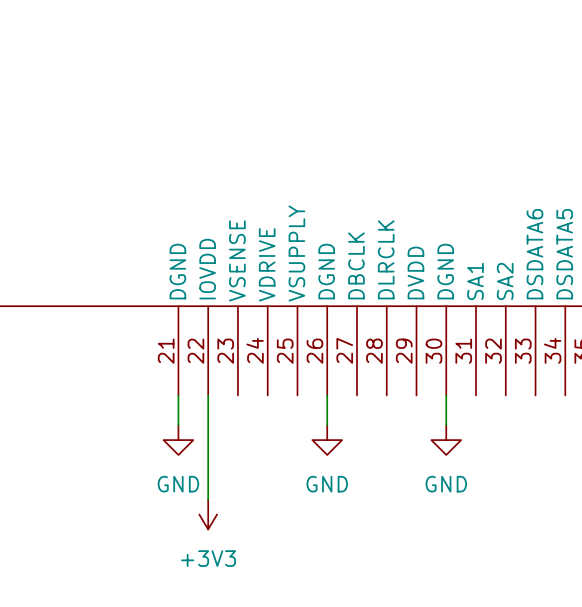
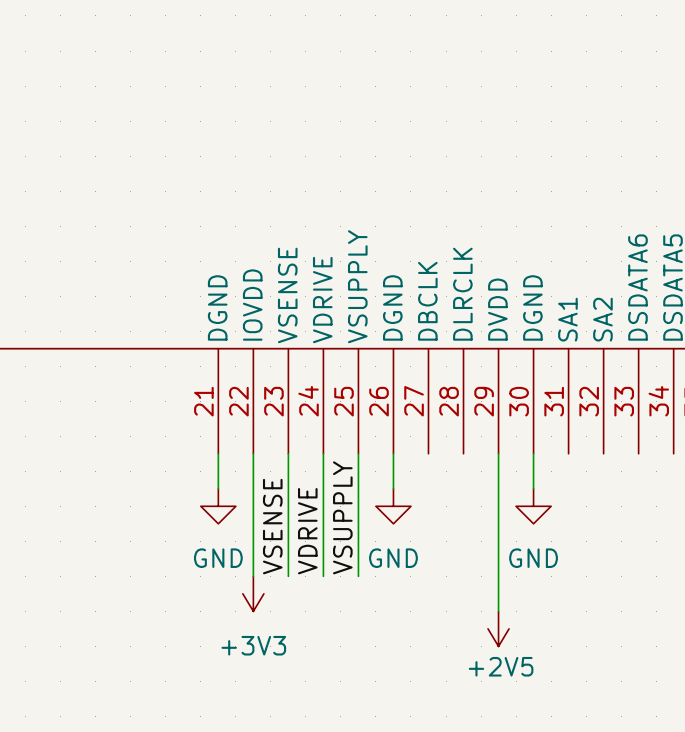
wire: none -> (288, 453) (288, 576)
wire: none -> (323, 453) (323, 576)
wire: none -> (358, 453) (358, 576)
wire: none -> (498, 453) (498, 611)
label: none -> VSUPPLY (342, 517)
label: none -> VSENSE (272, 526)
label: none -> VDRIVE (307, 531)
power symbol: none -> +2V5 (498, 628)

